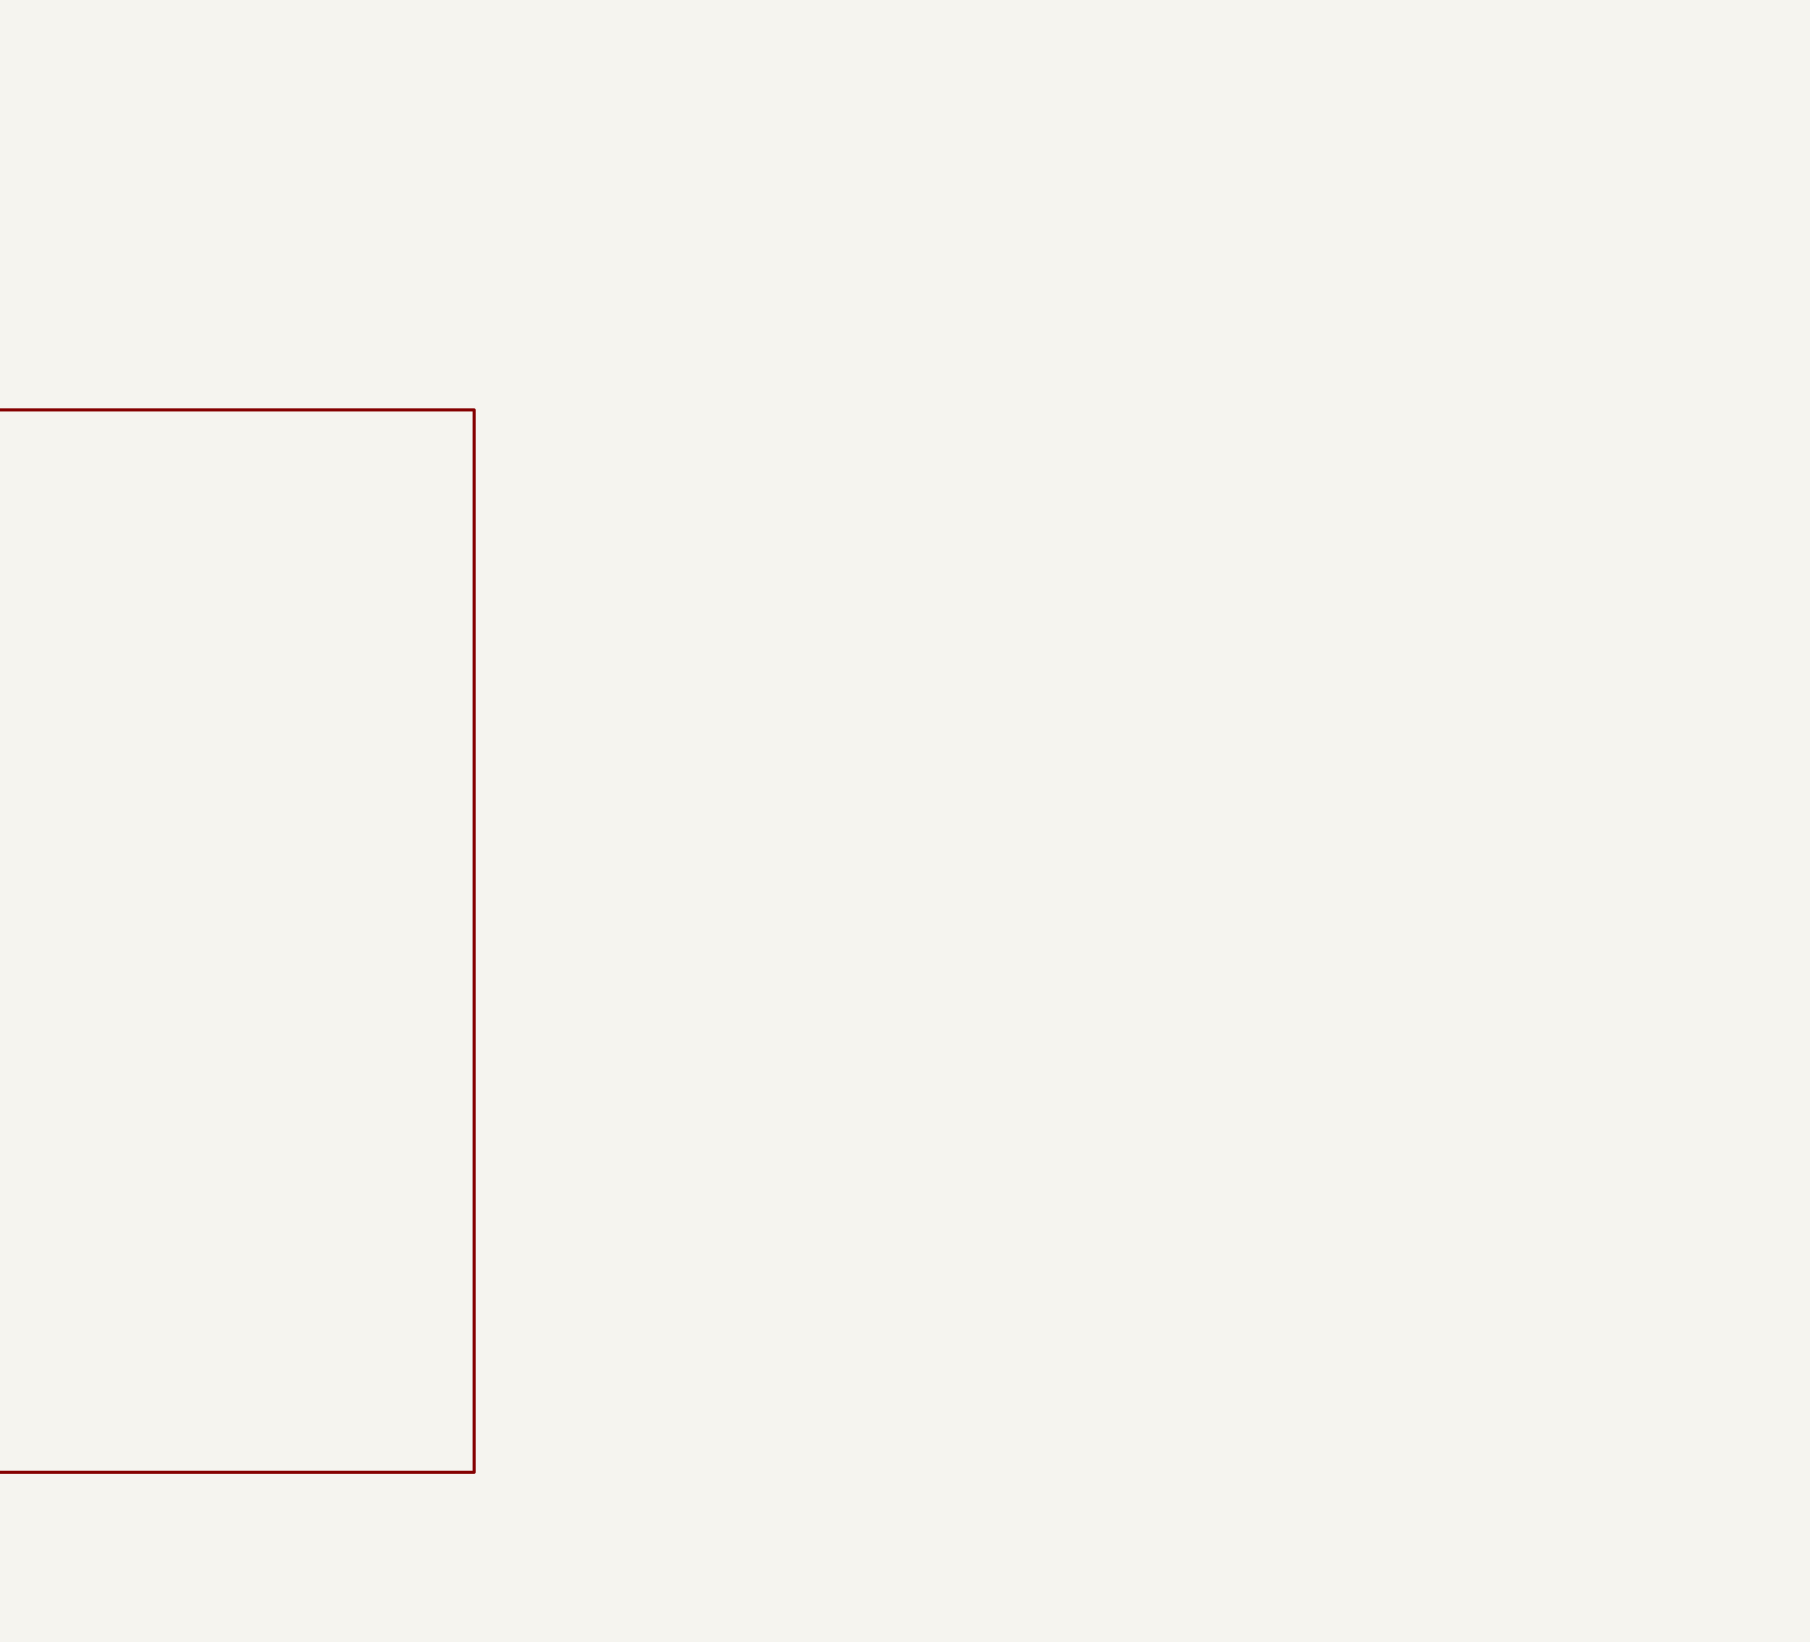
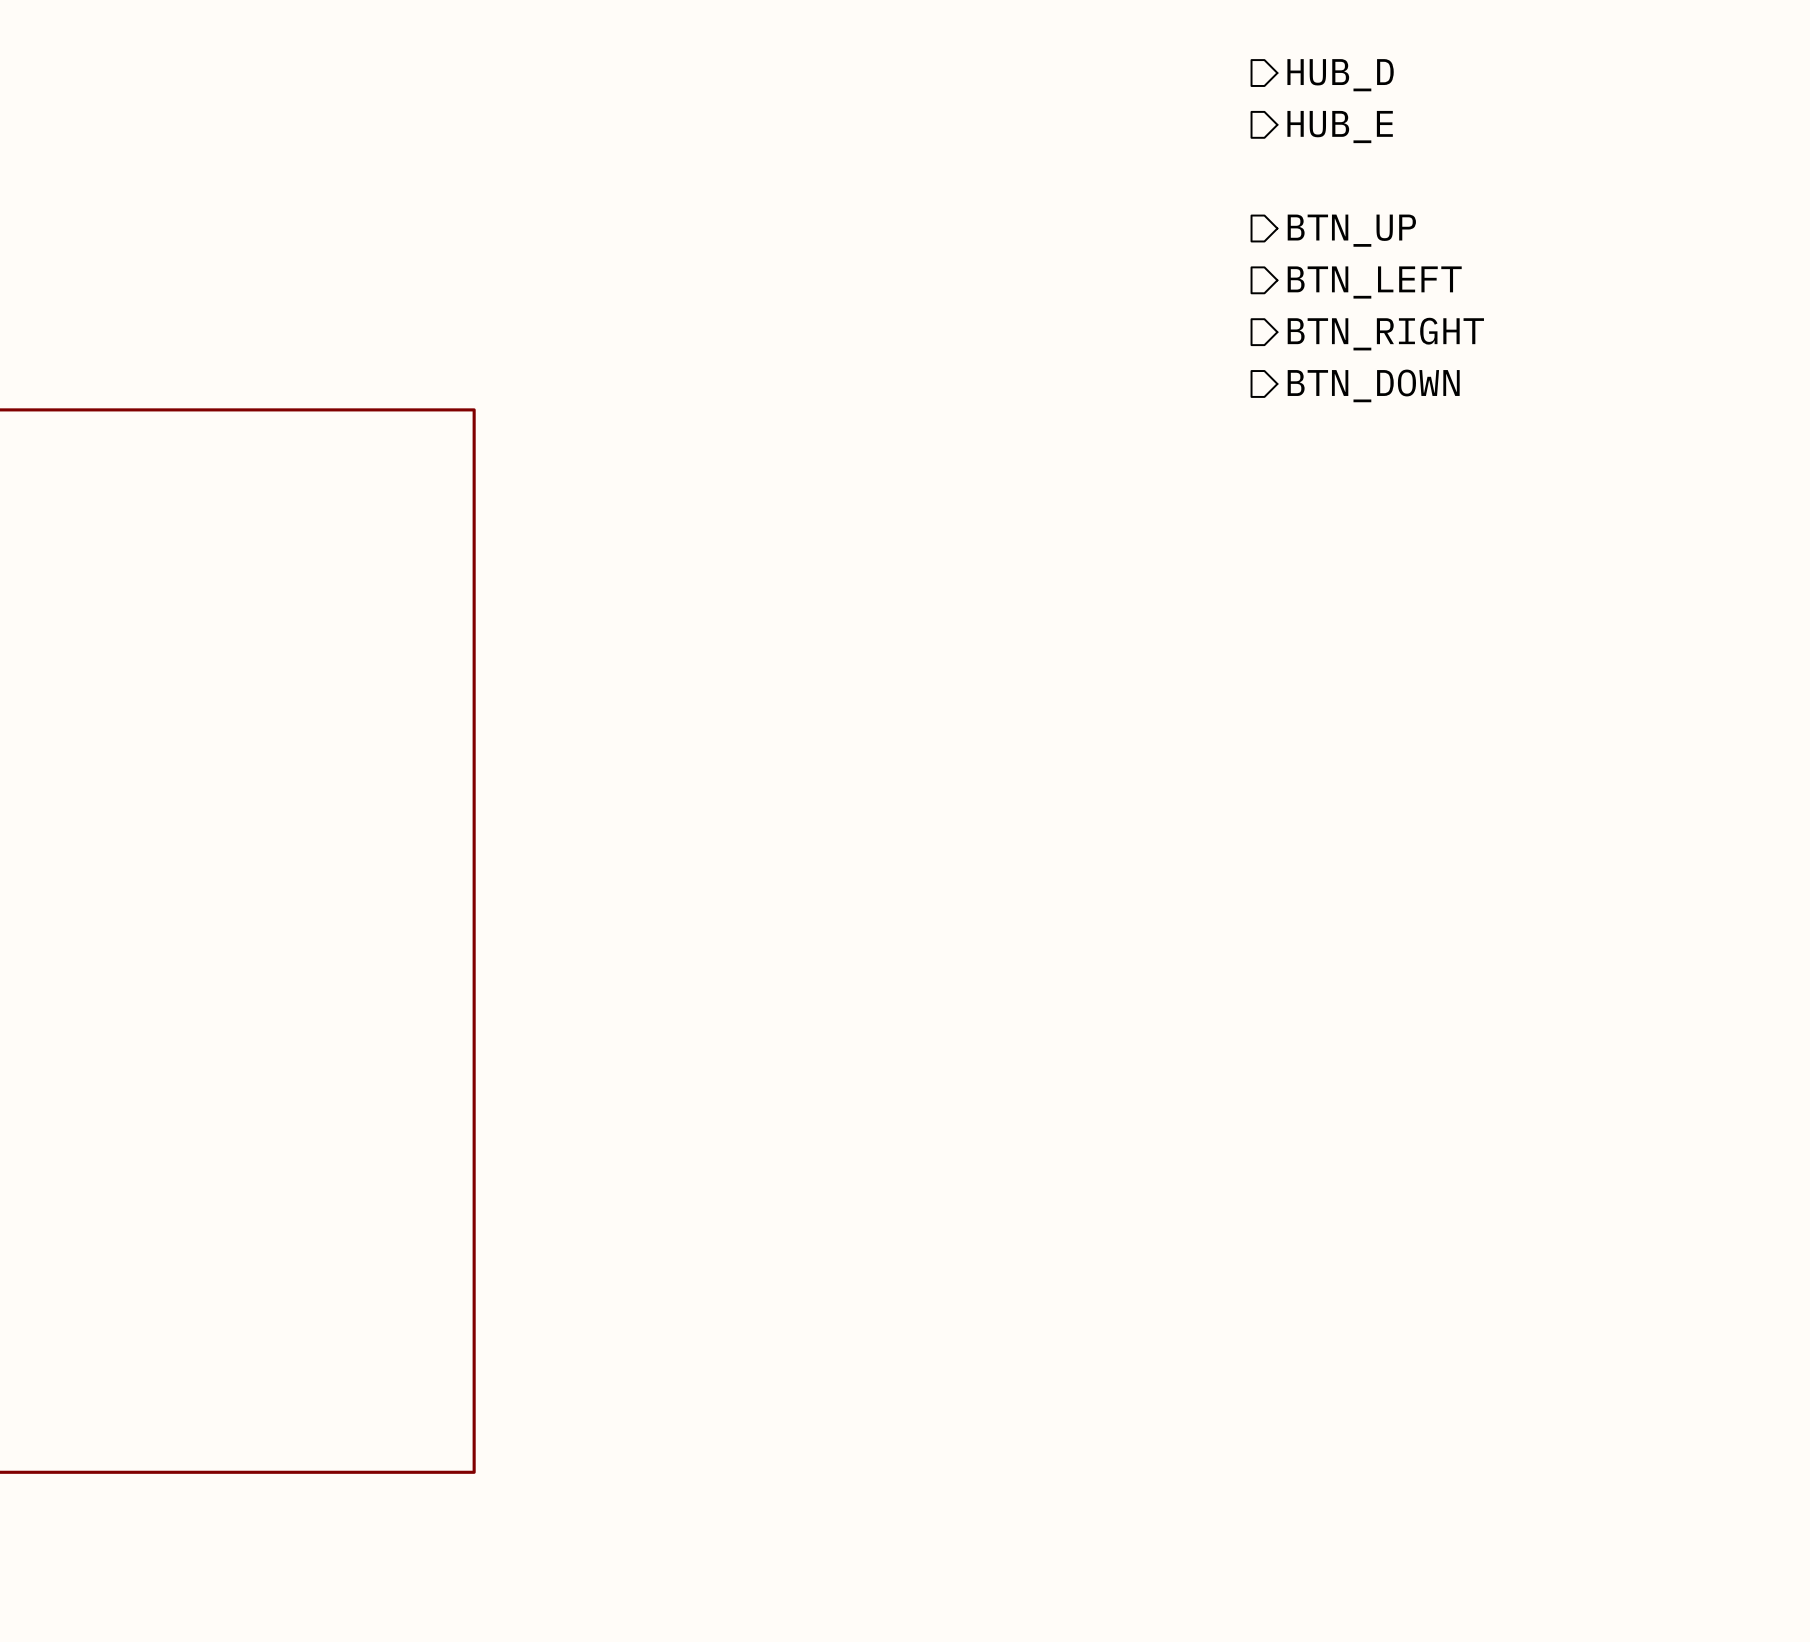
sheet pin: none -> HUB_D (1340, 75)
sheet pin: none -> HUB_E (1340, 127)
sheet pin: none -> BTN_UP (1351, 230)
sheet pin: none -> BTN_LEFT (1374, 282)
sheet pin: none -> BTN_RIGHT (1385, 334)
sheet pin: none -> BTN_DOWN (1373, 385)

